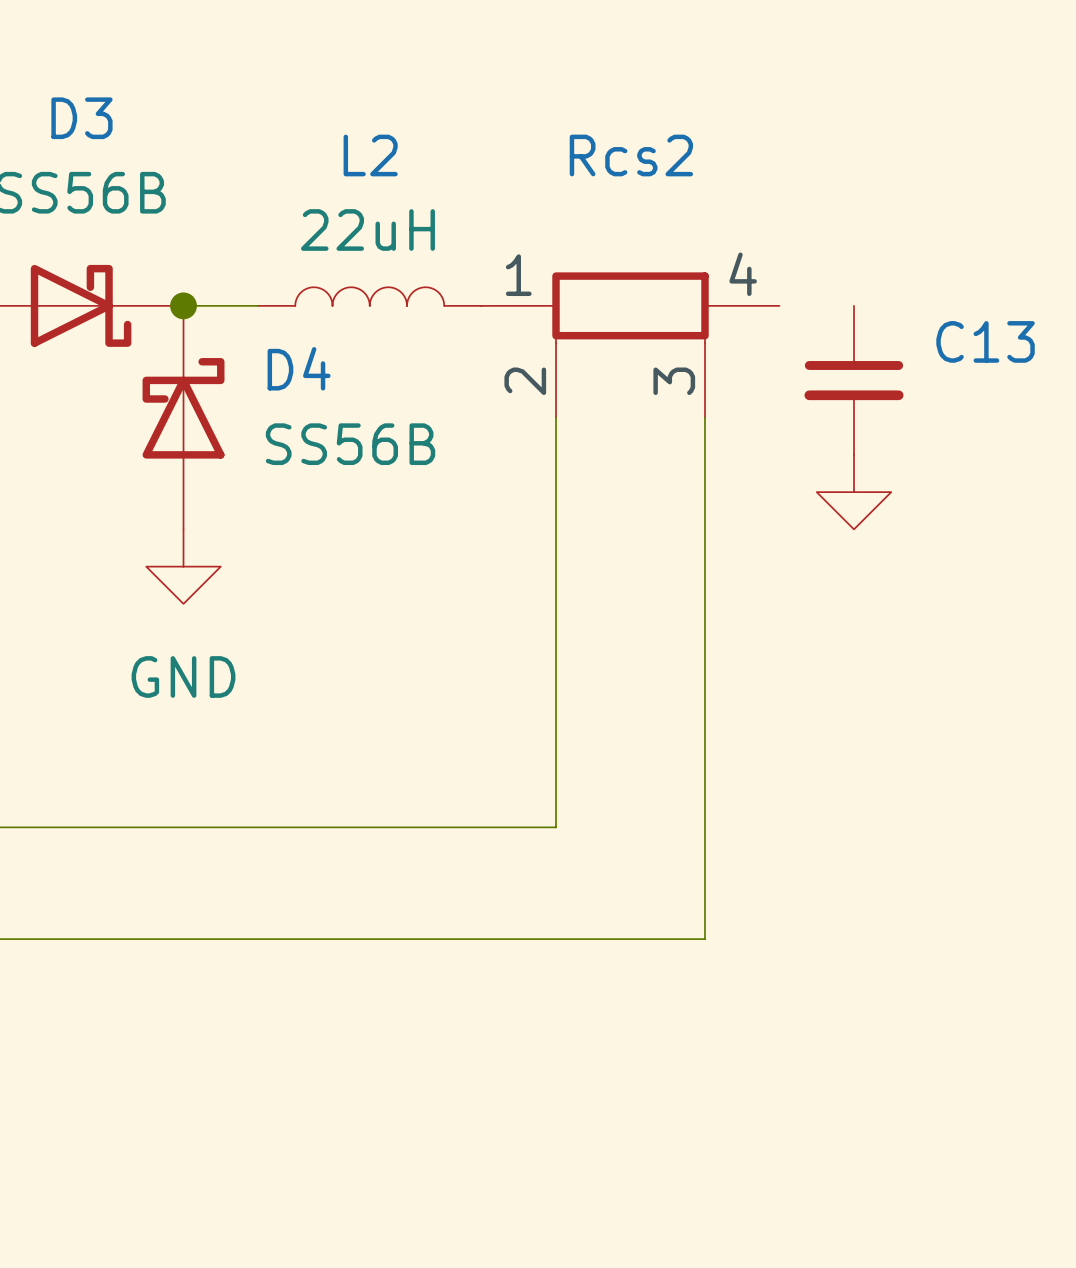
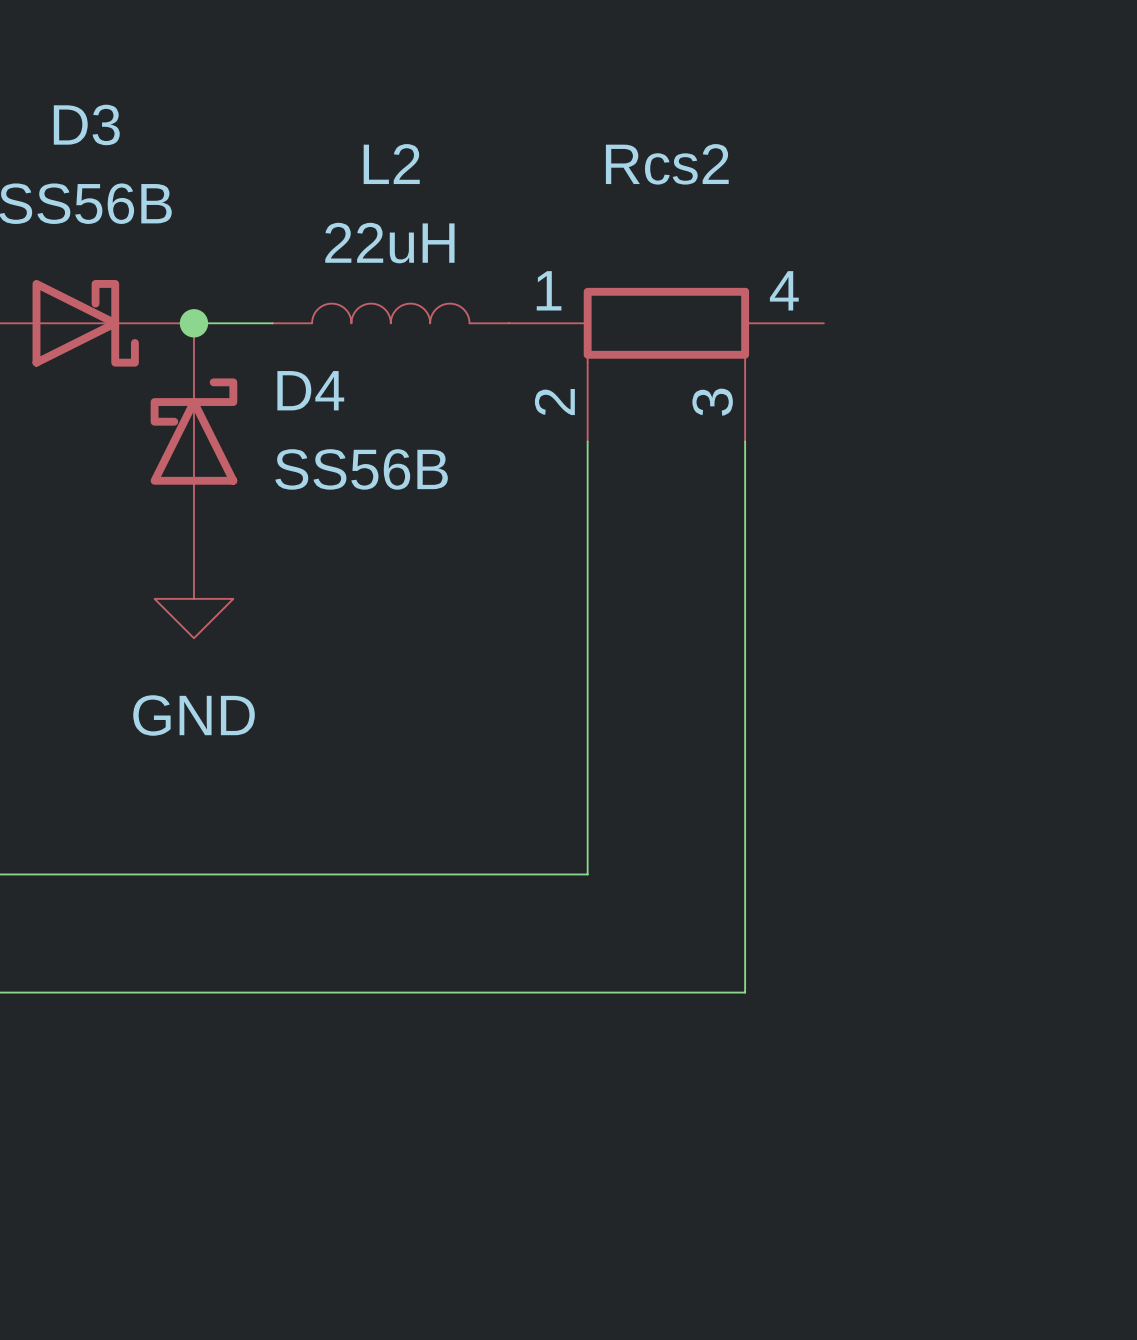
C13: (853, 380) -> none
power symbol: (853, 492) -> none

